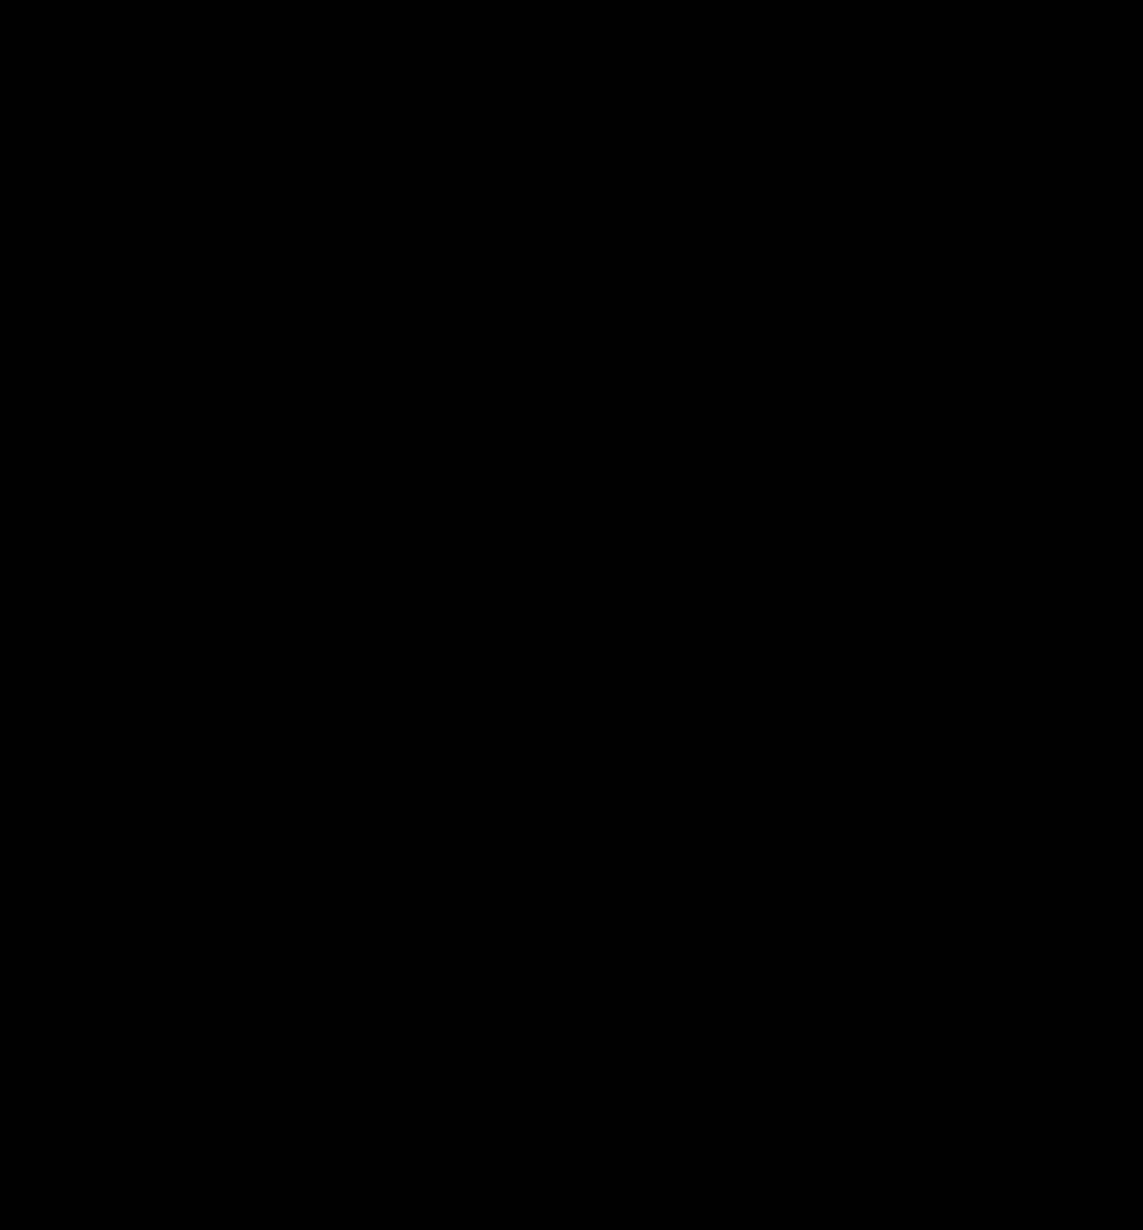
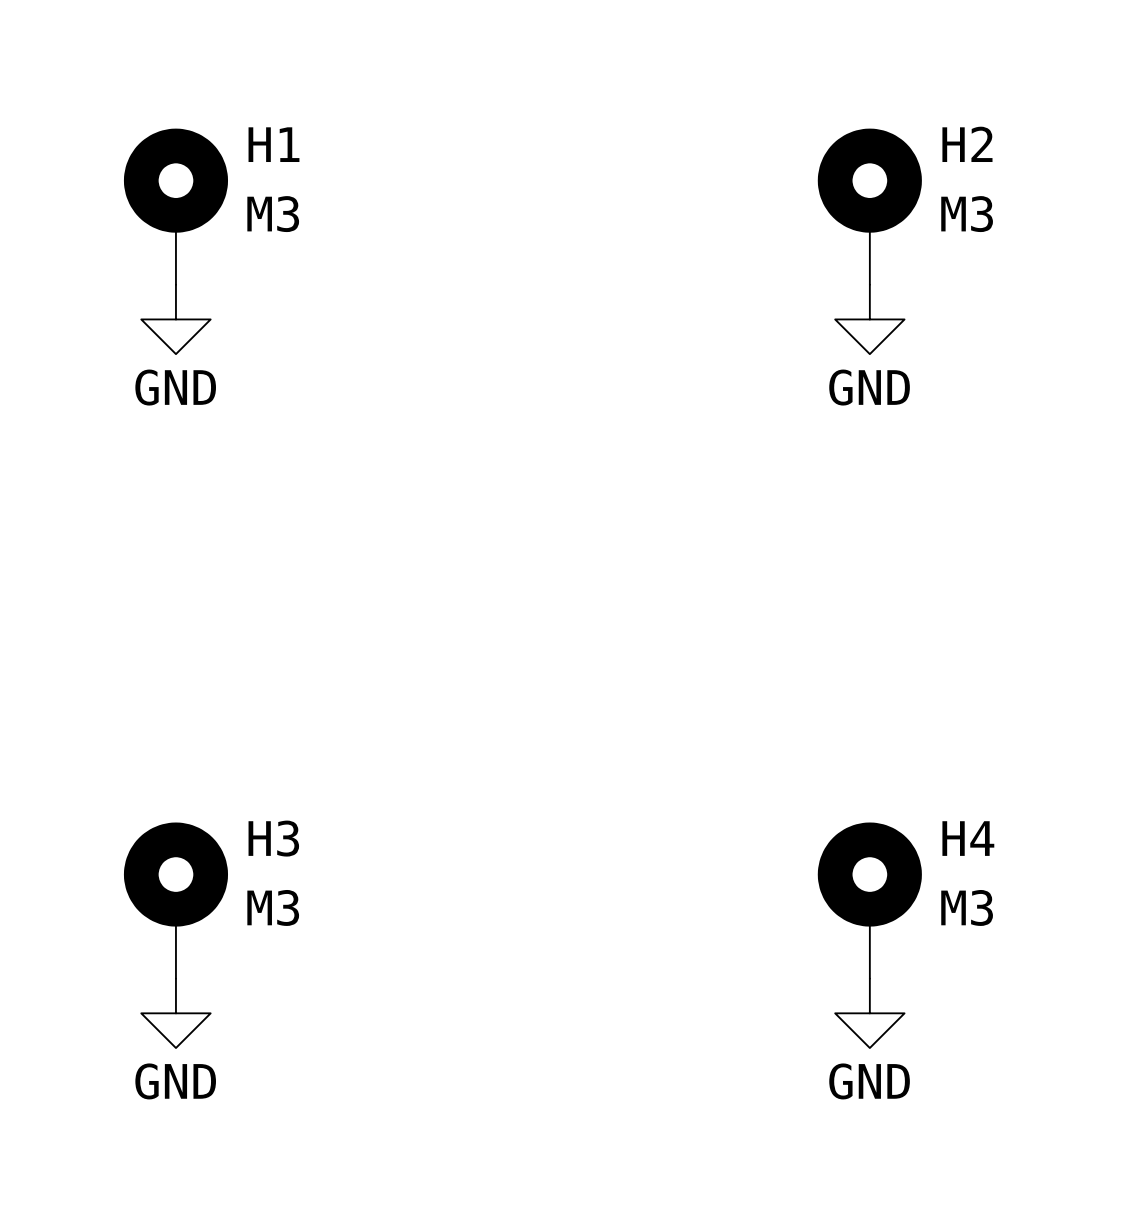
H1: none -> M3 (175, 206)
H2: none -> M3 (869, 206)
power symbol: none -> GND (175, 319)
power symbol: none -> GND (869, 319)
H3: none -> M3 (175, 900)
H4: none -> M3 (869, 900)
power symbol: none -> GND (175, 1013)
power symbol: none -> GND (869, 1013)

